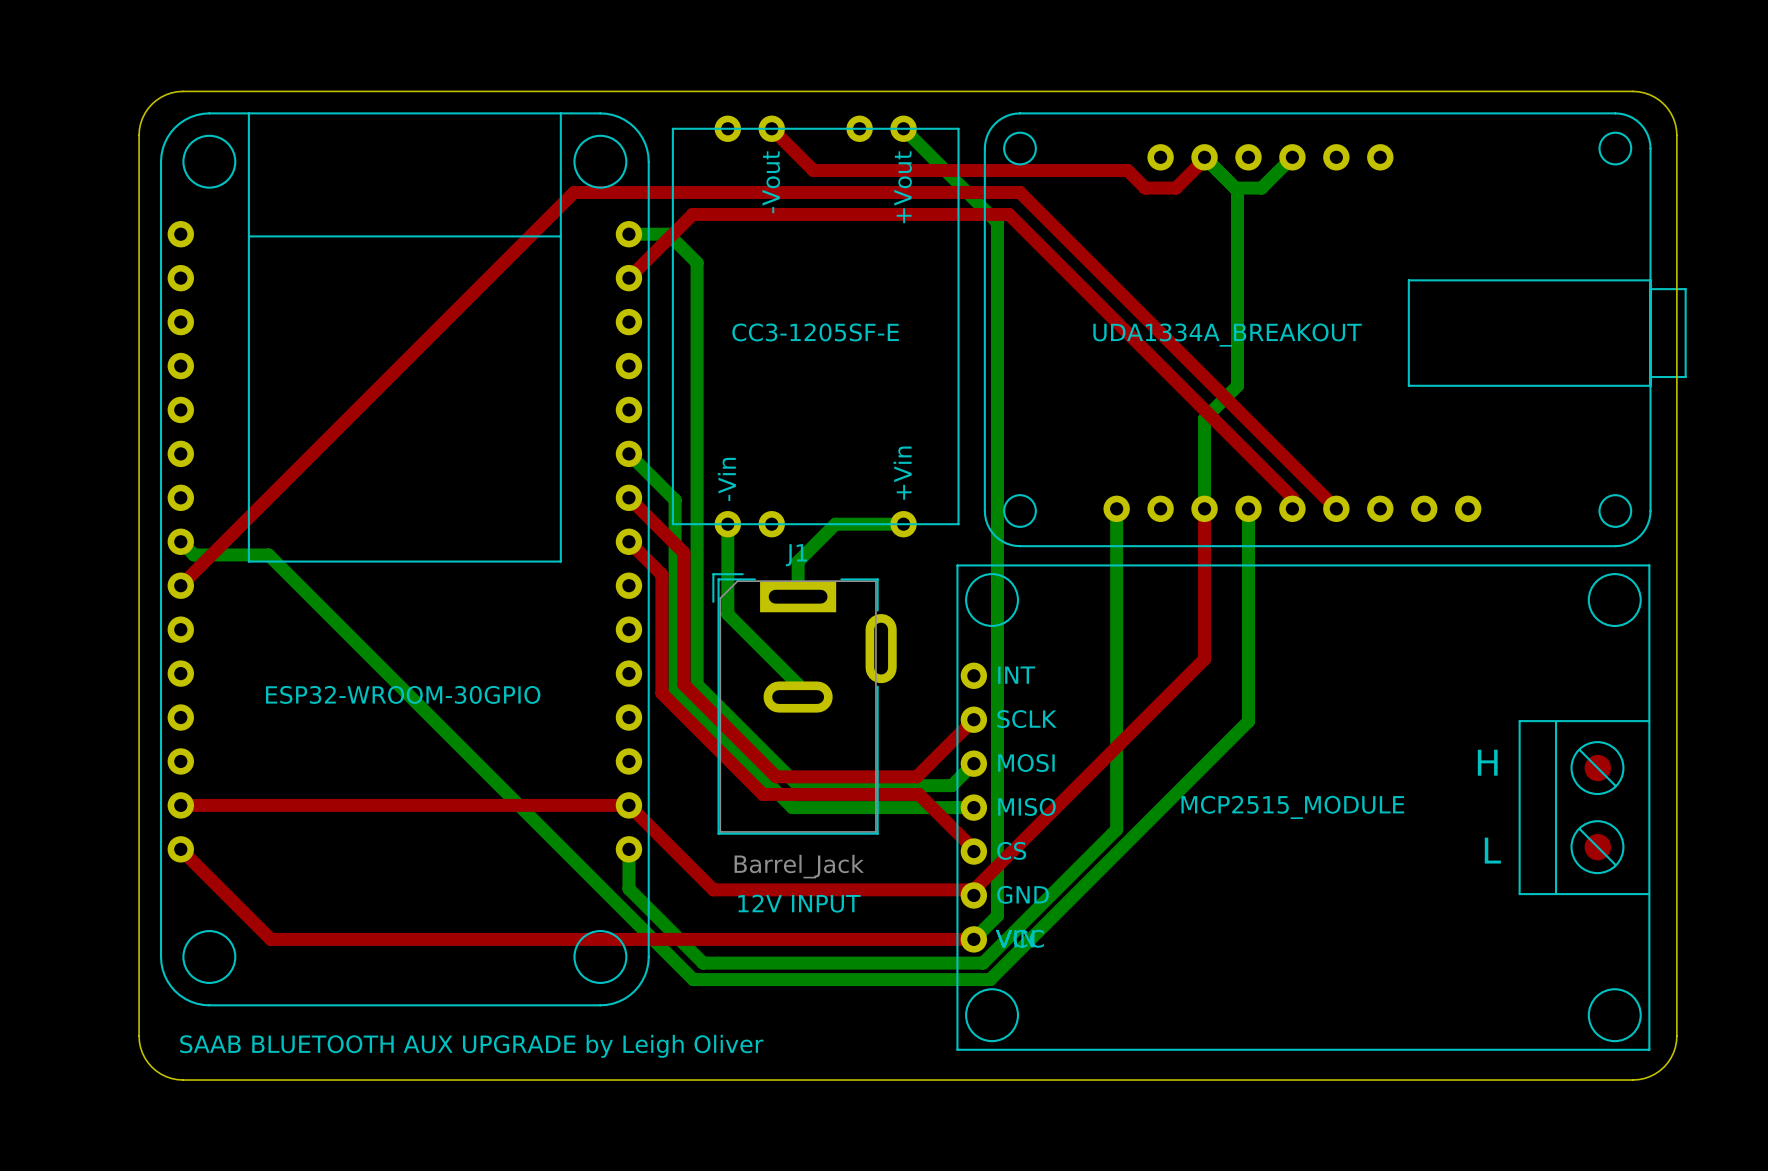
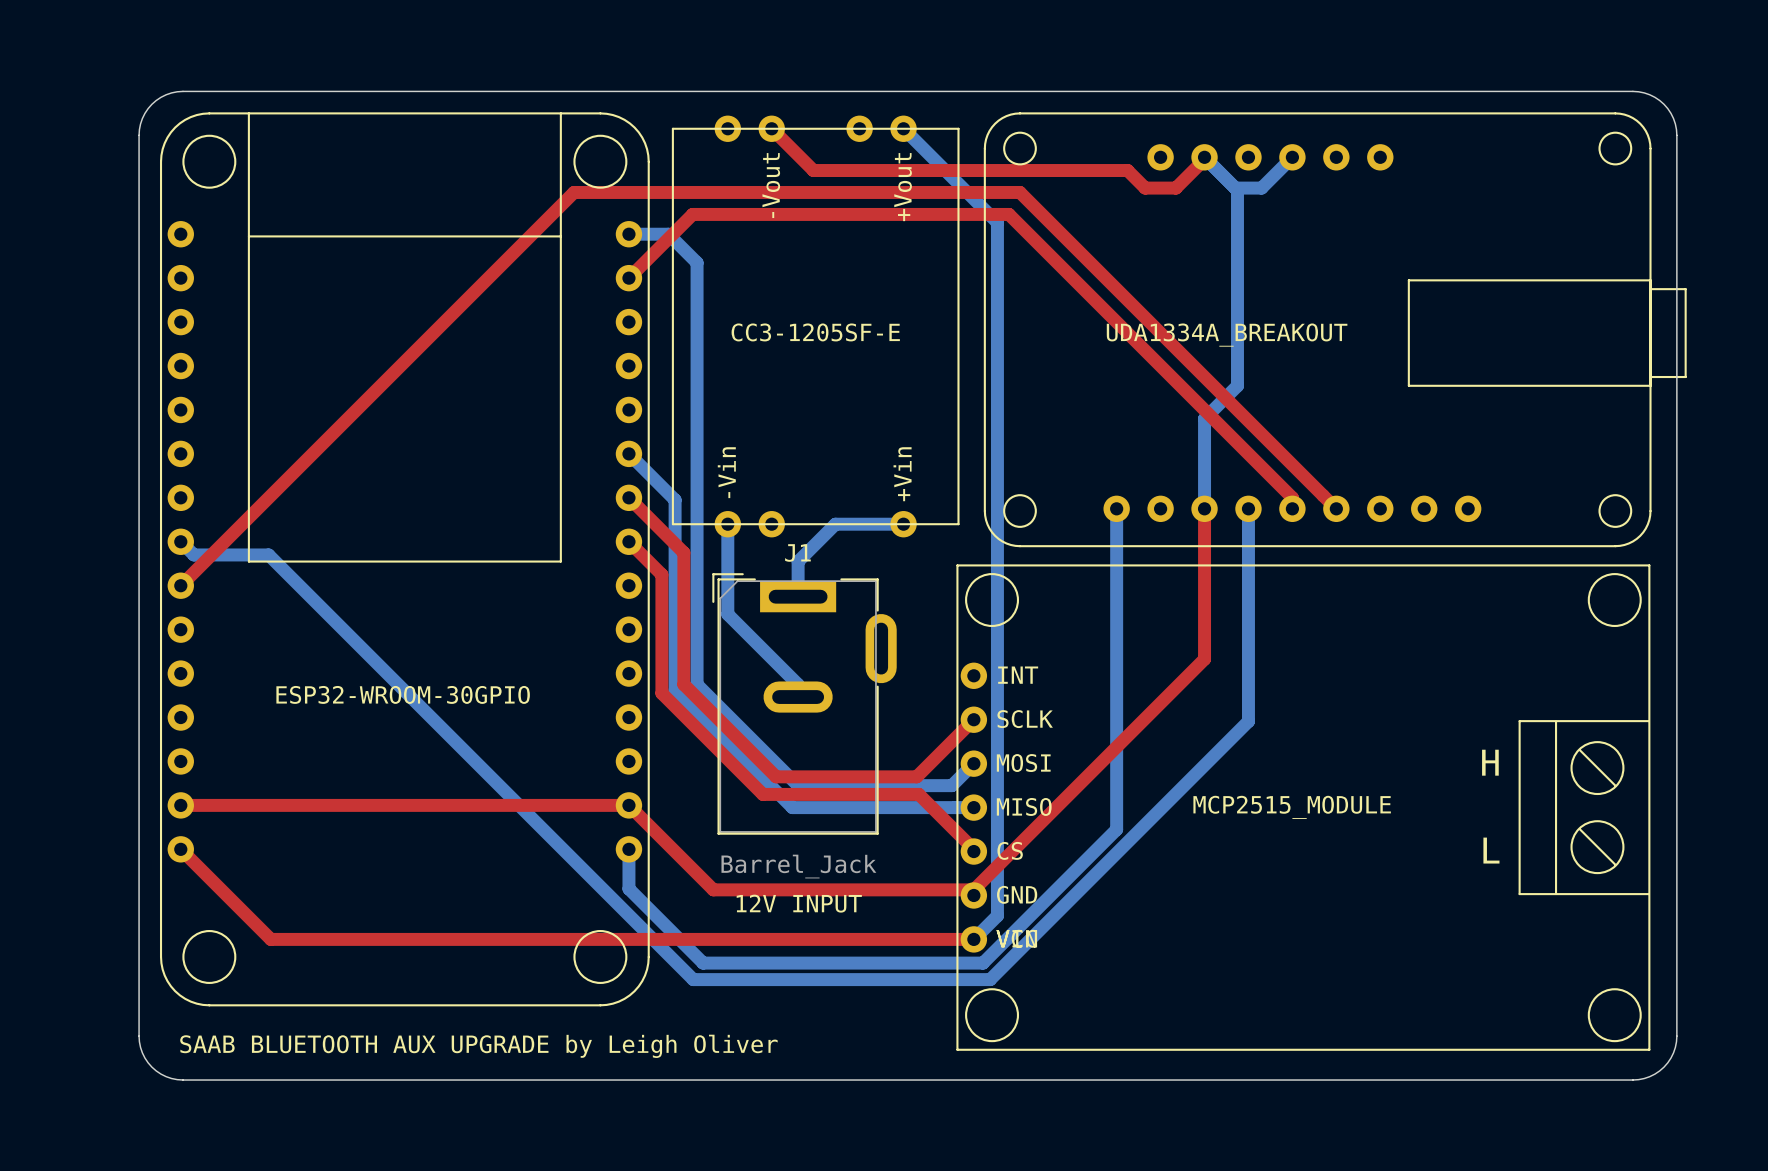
part footprint: [956, 564, 1651, 1051] -> [956, 564, 1651, 1051]

